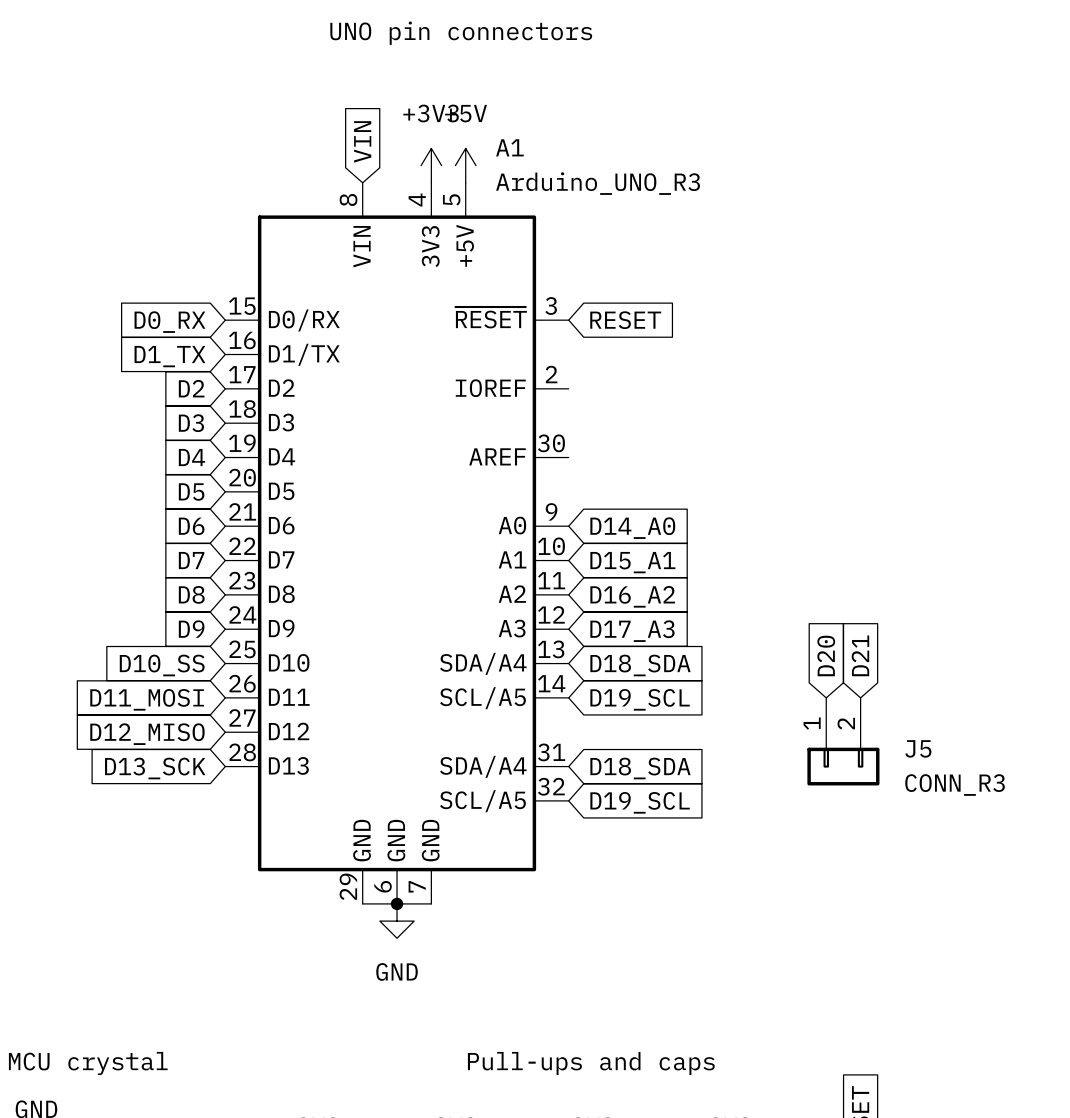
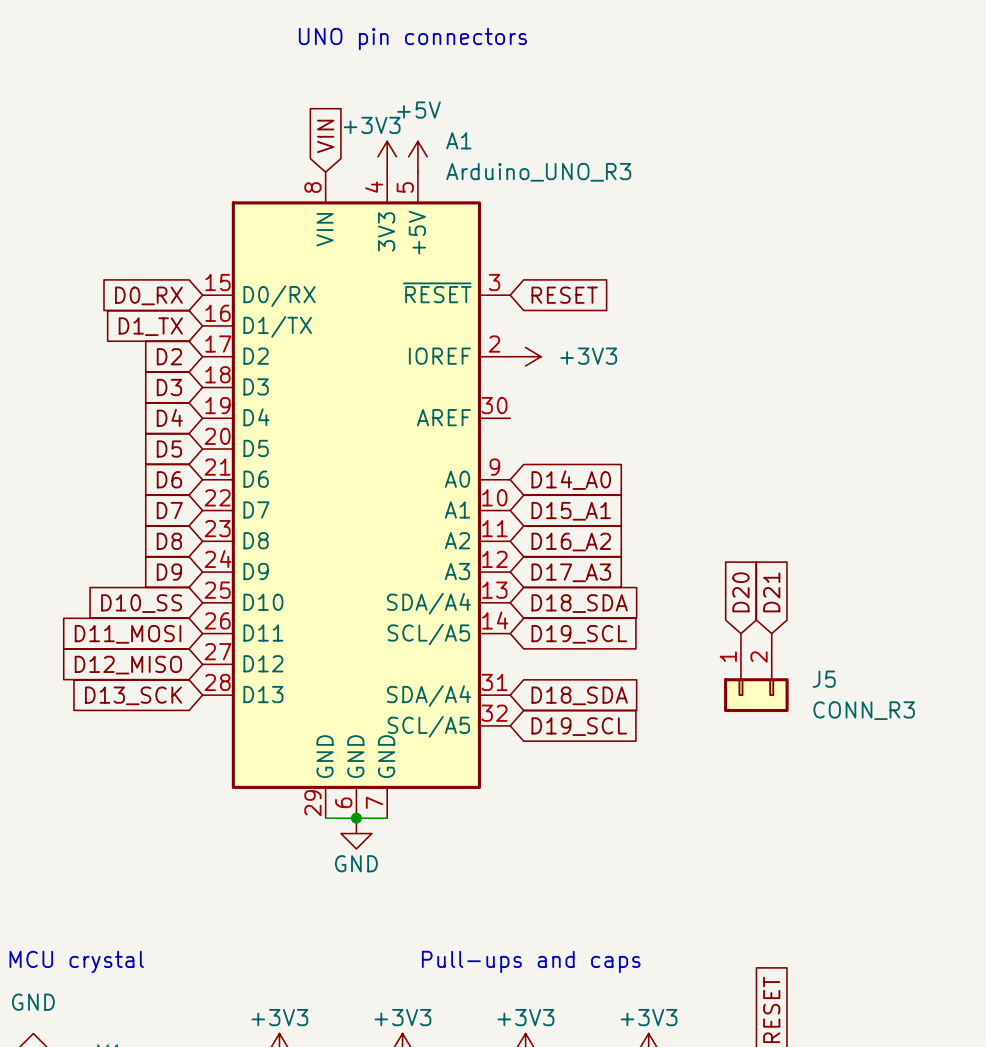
power symbol text position: +3V3 (431, 113) -> +3V3 (372, 125)
power symbol: none -> +3V3 (525, 356)
power symbol text position: GND (397, 971) -> GND (356, 863)

